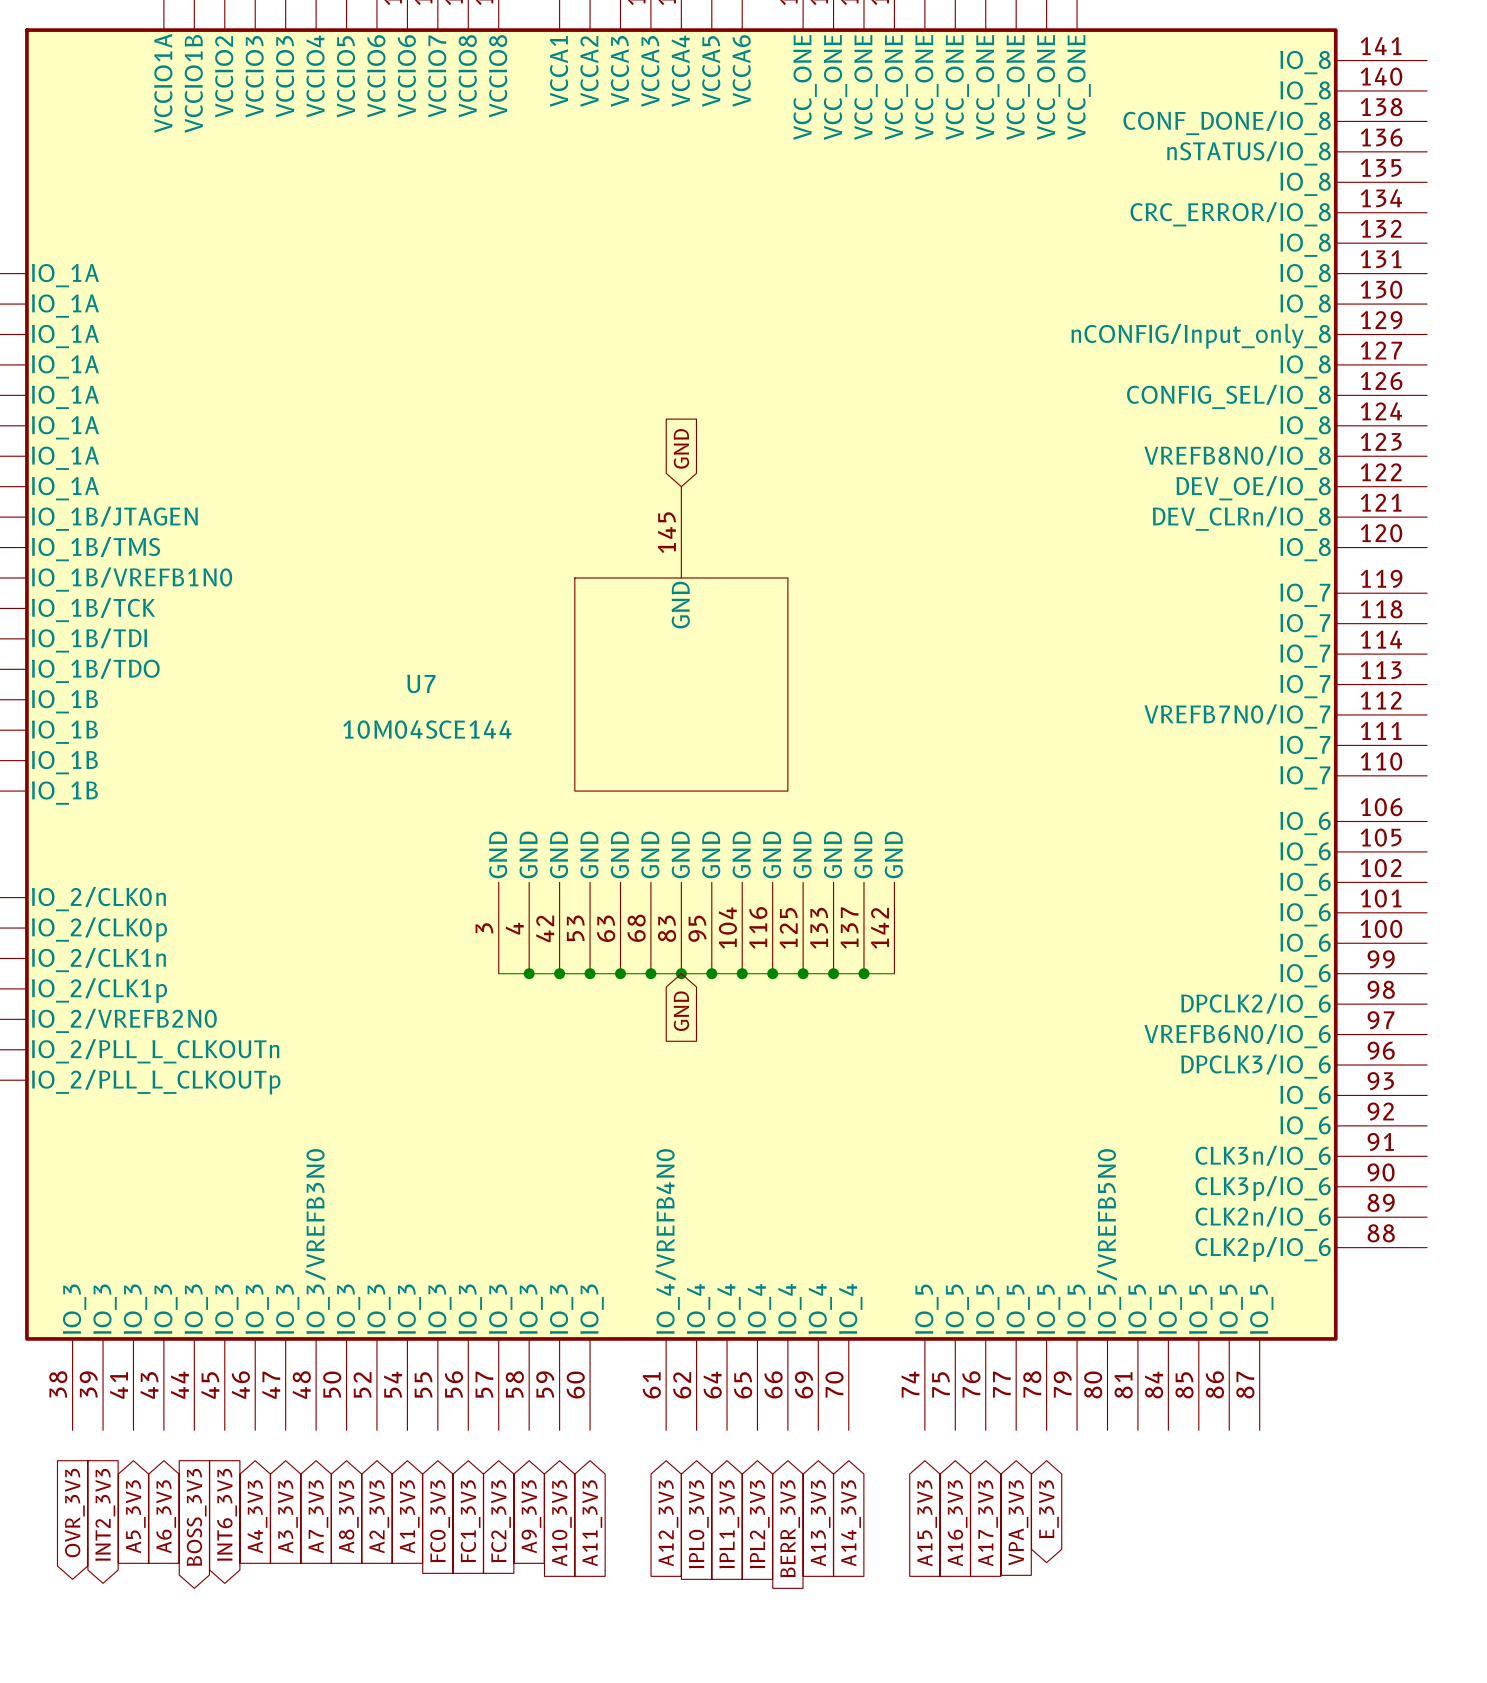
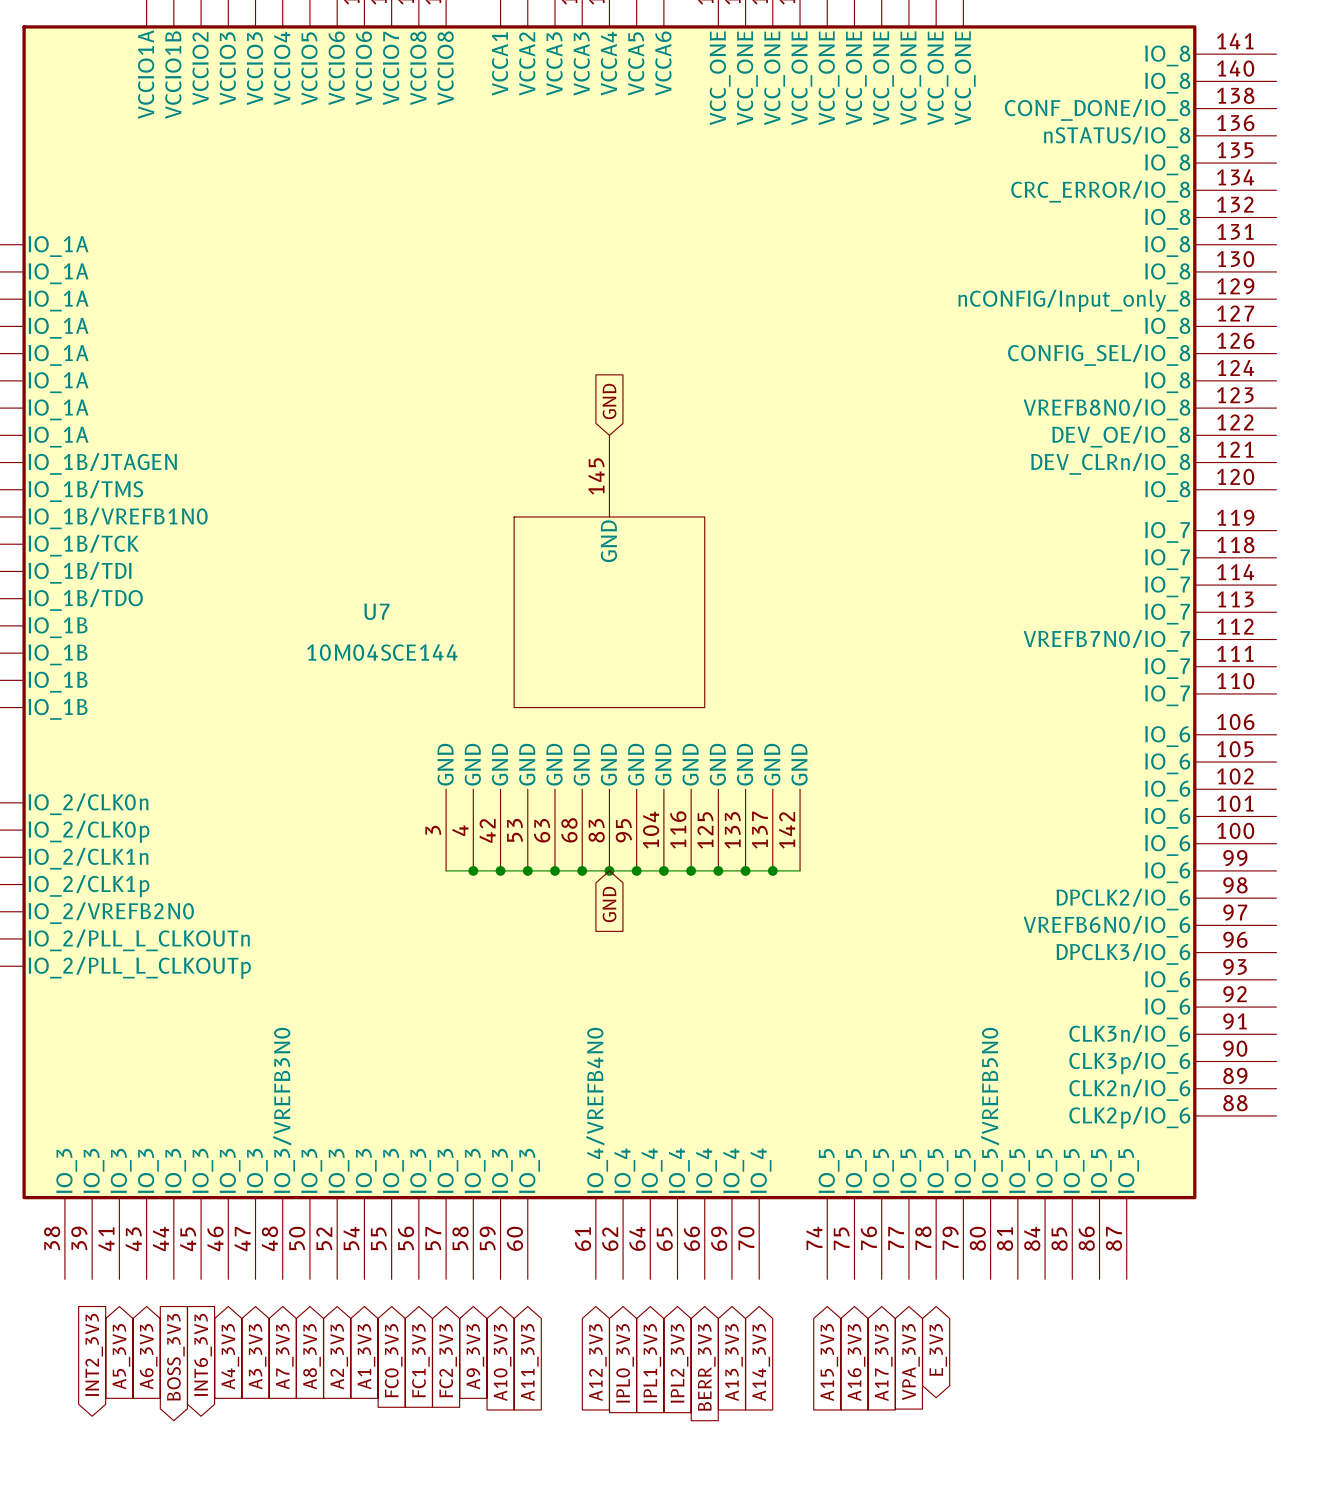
global label: OVR_3V3 (74, 1513) -> none

